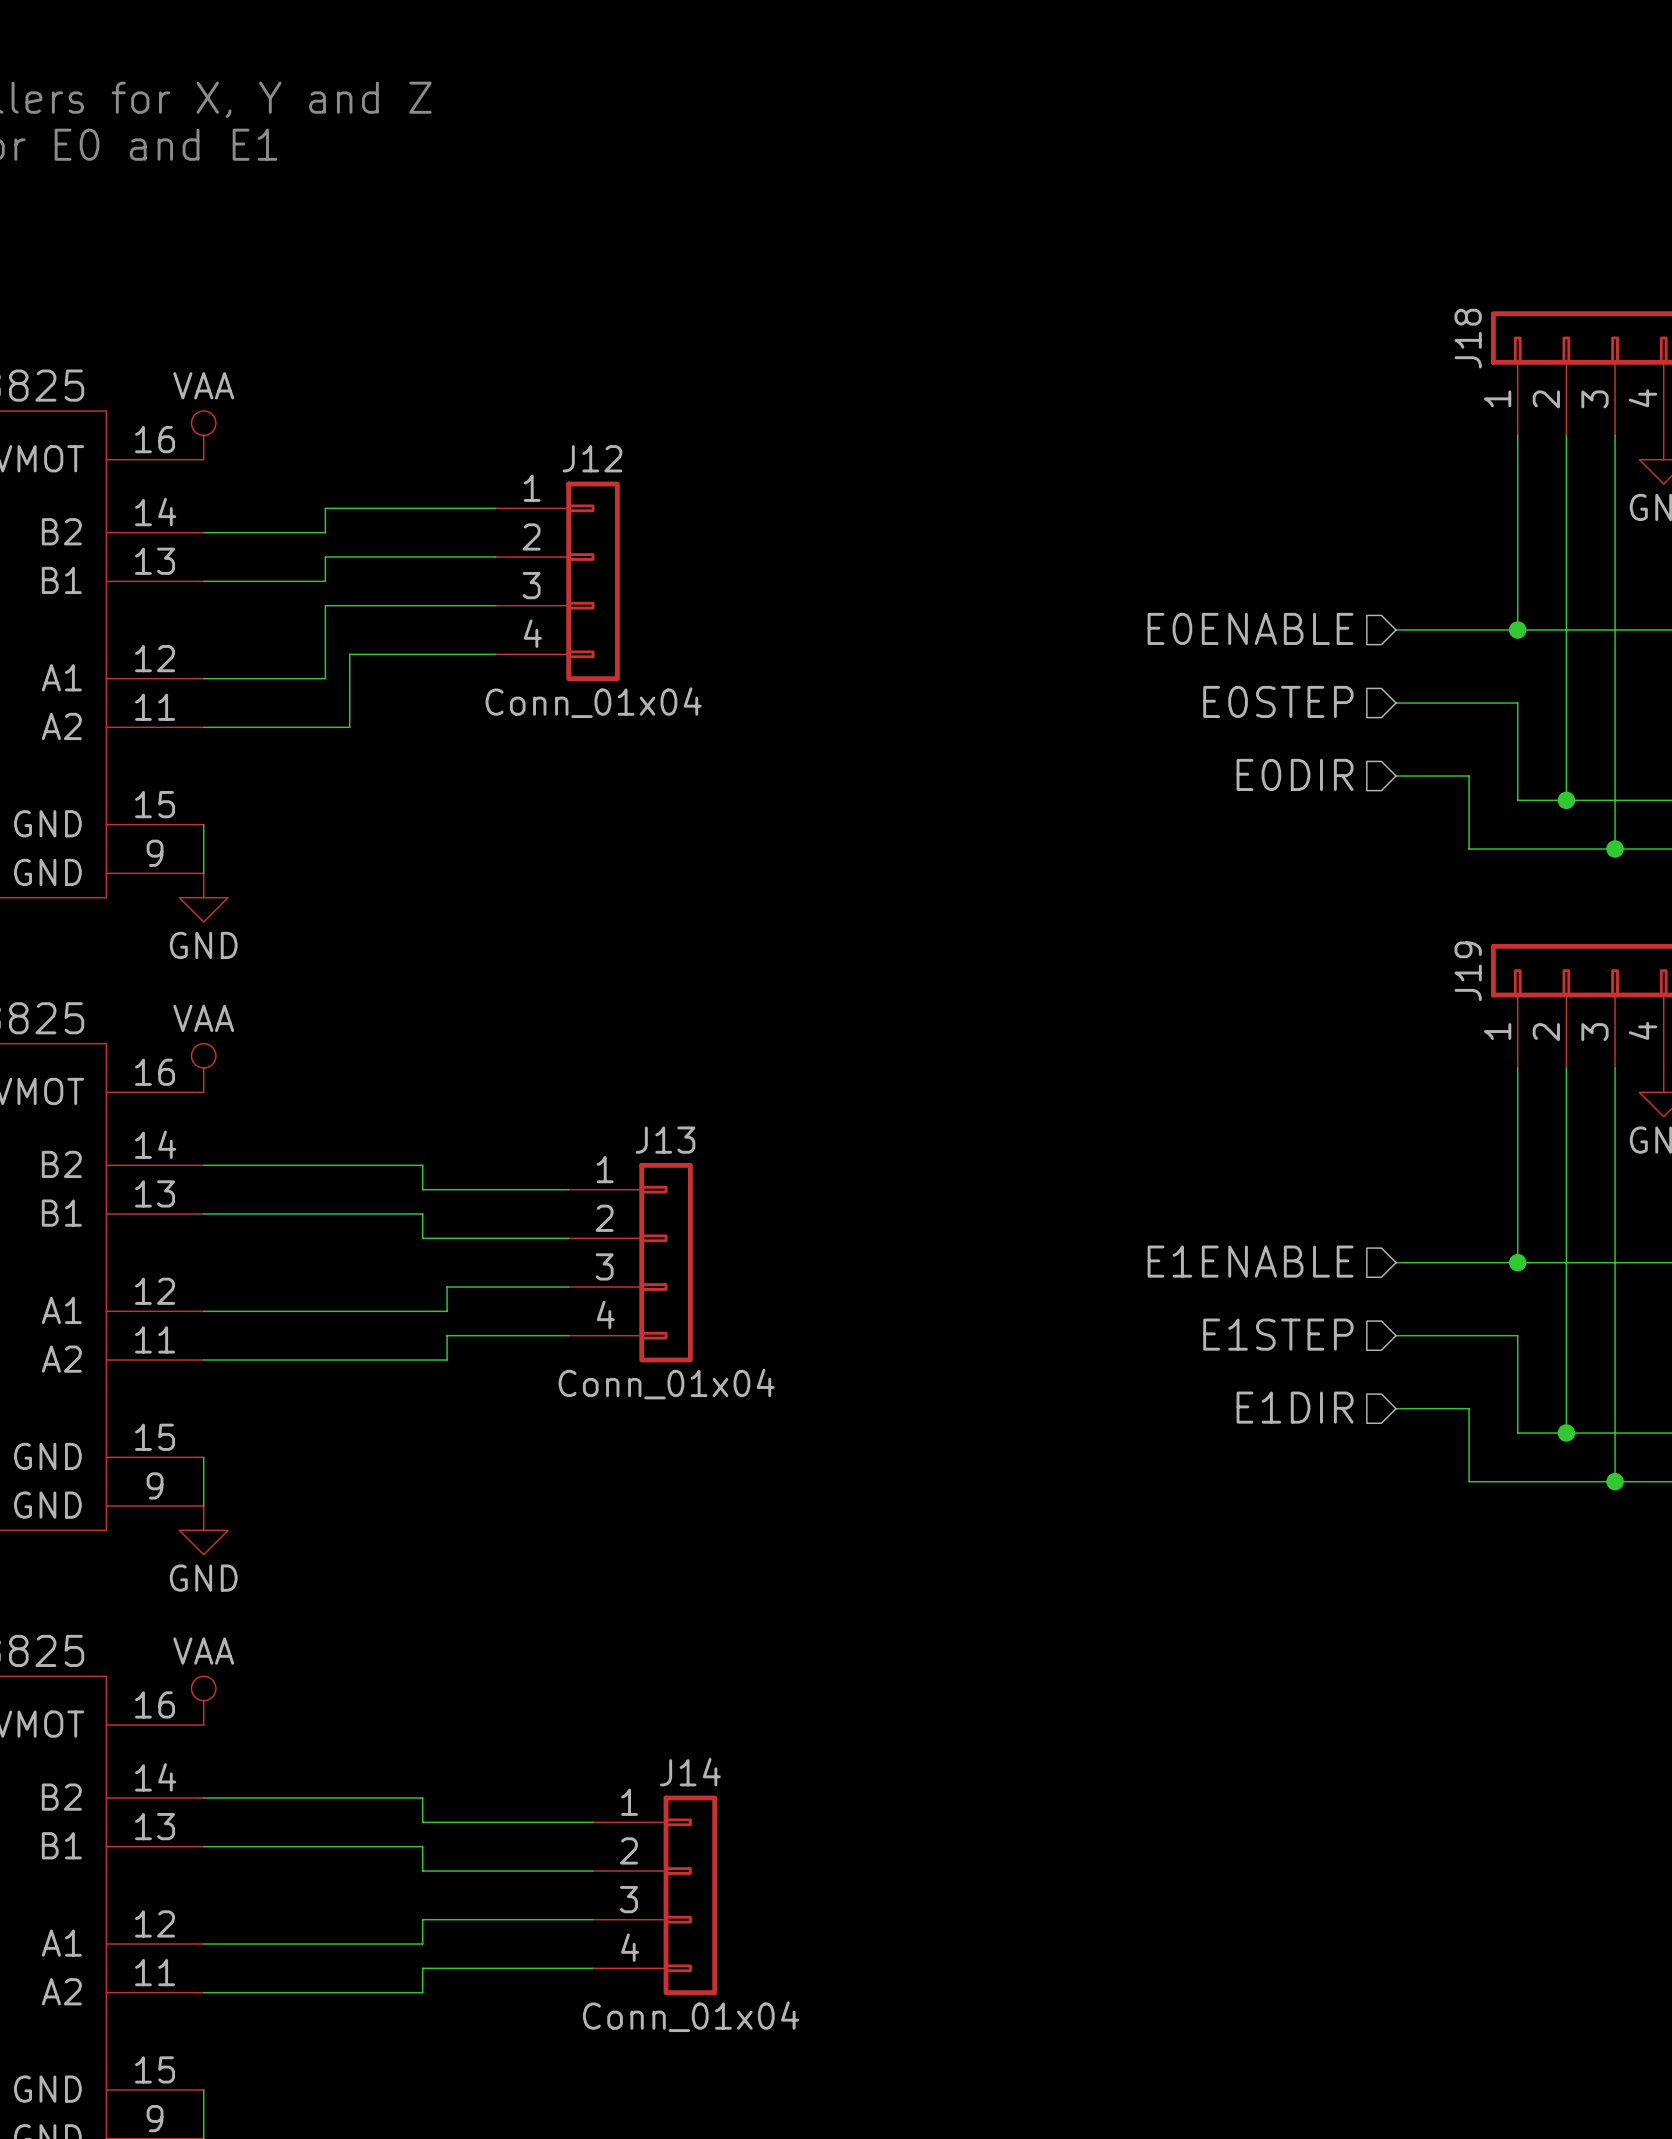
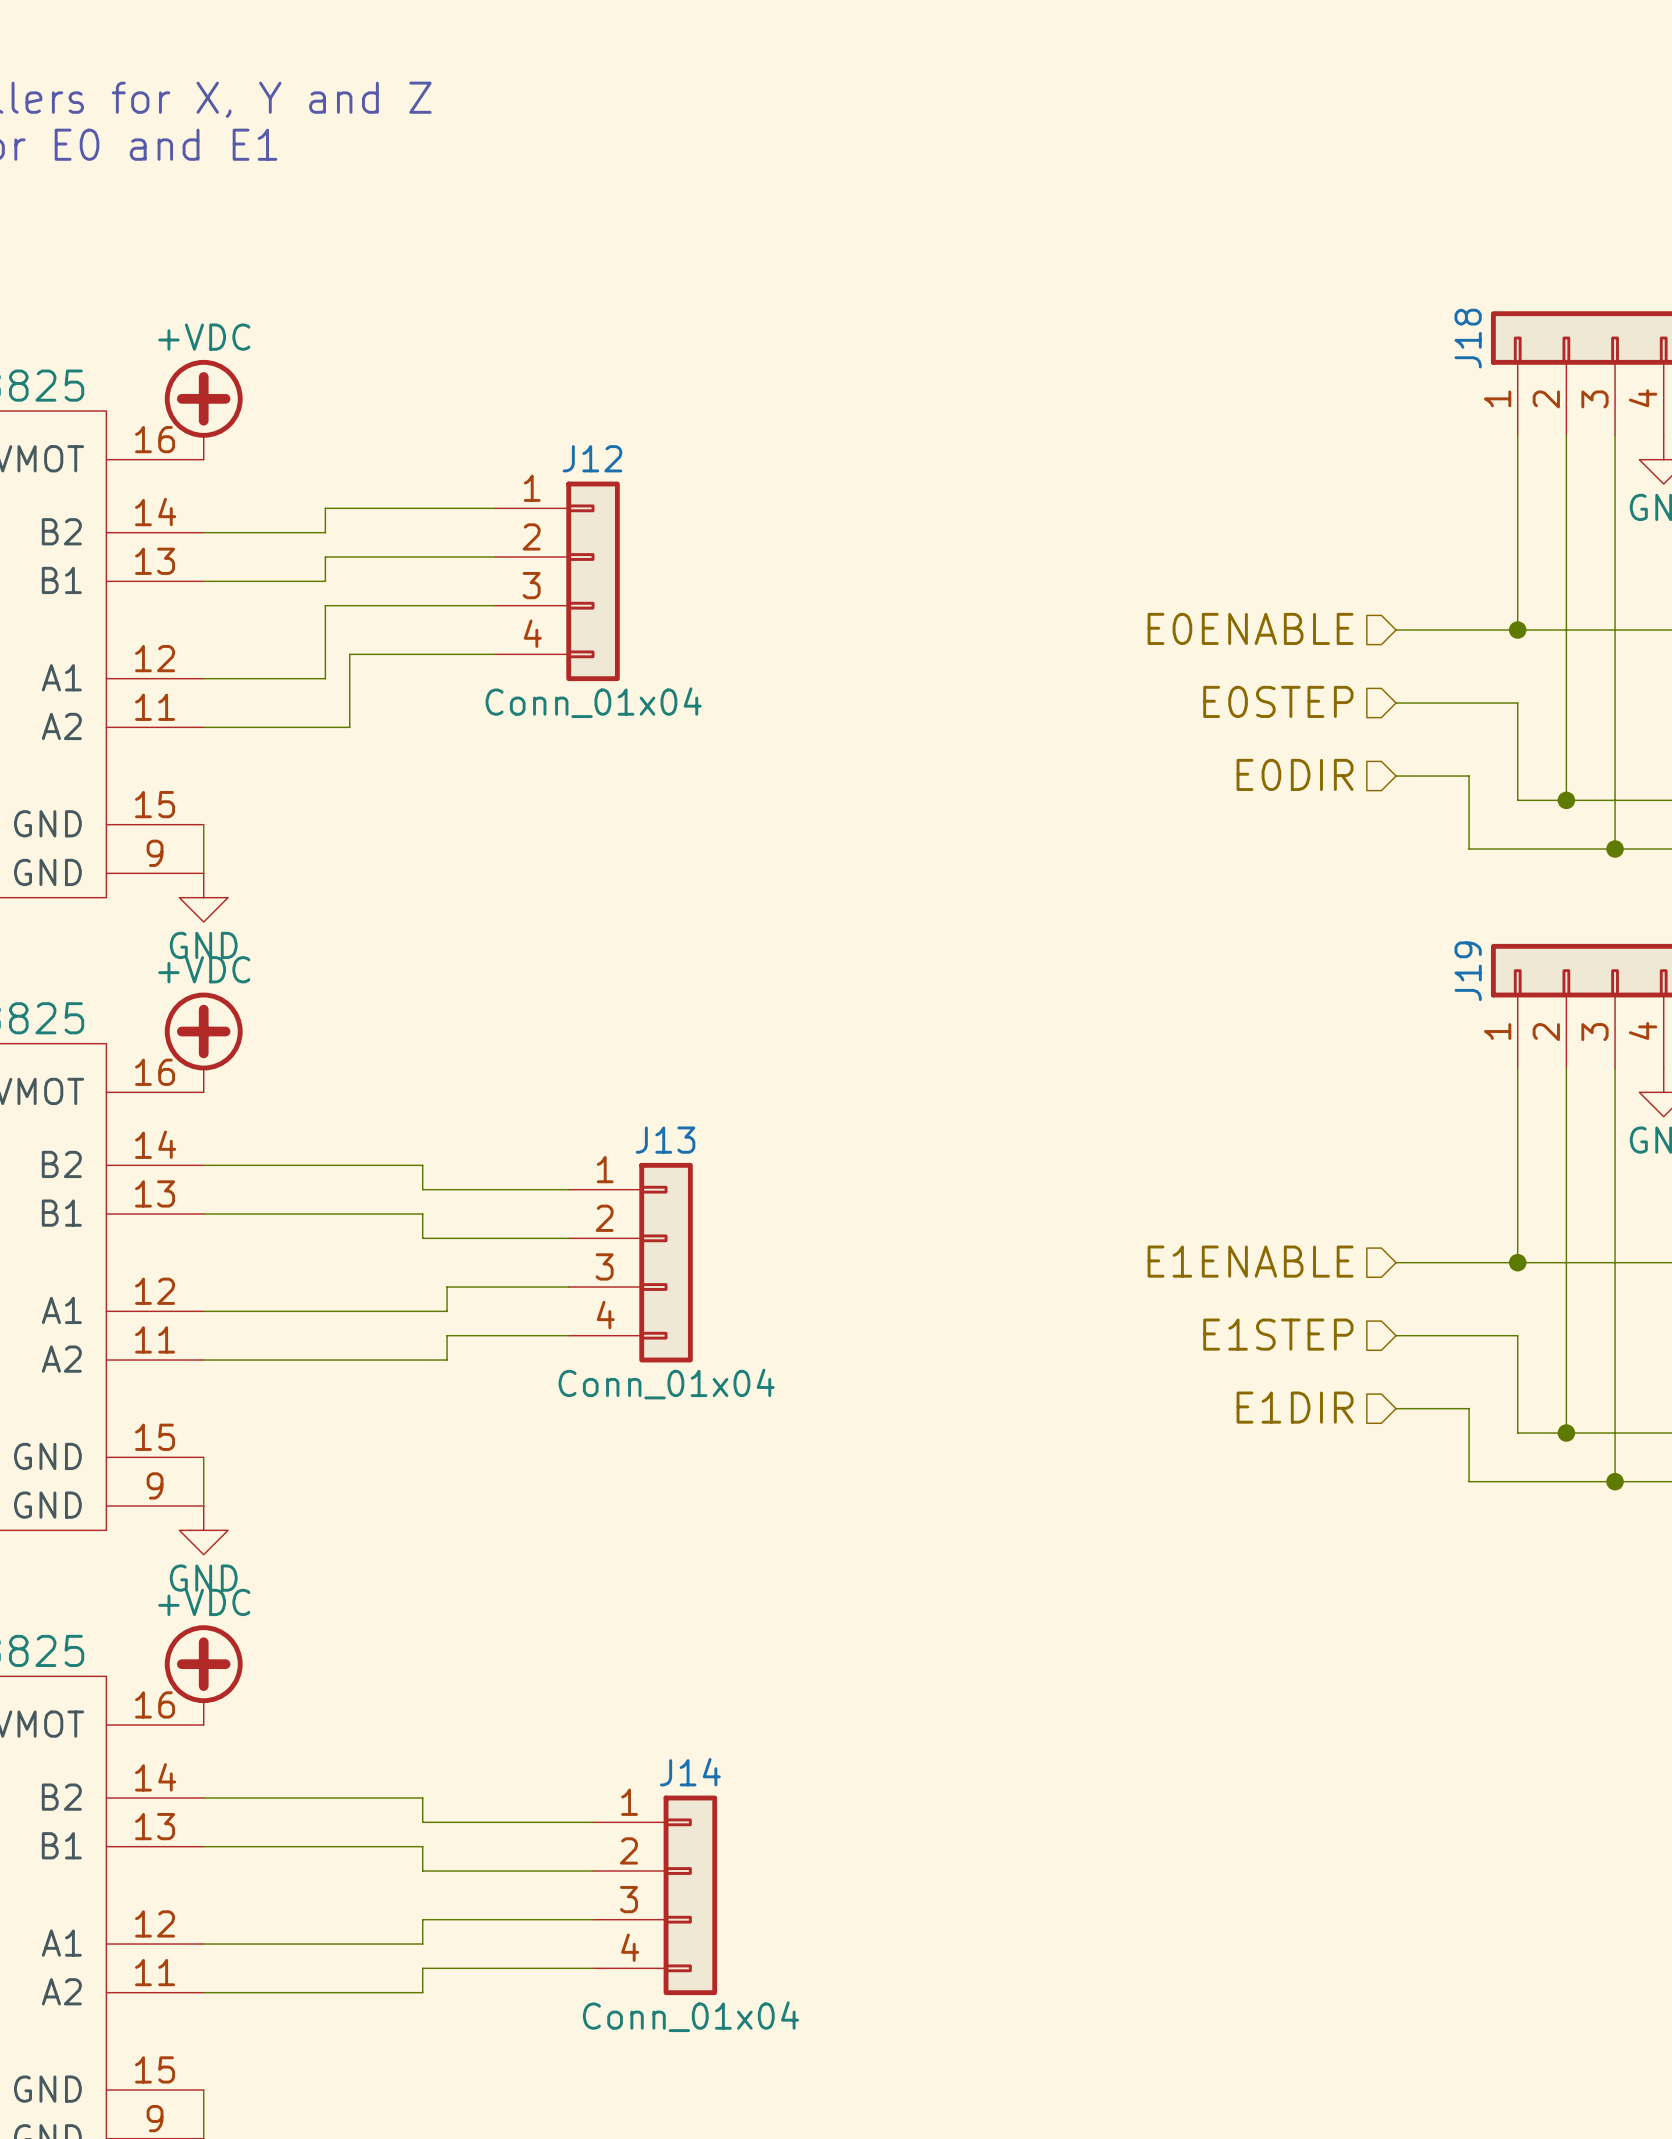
power symbol: none -> +VDC (203, 409)
power symbol: VAA (203, 435) -> none
power symbol: none -> +VDC (203, 1042)
power symbol: VAA (203, 1068) -> none
power symbol: none -> +VDC (203, 1675)
power symbol: VAA (203, 1700) -> none

